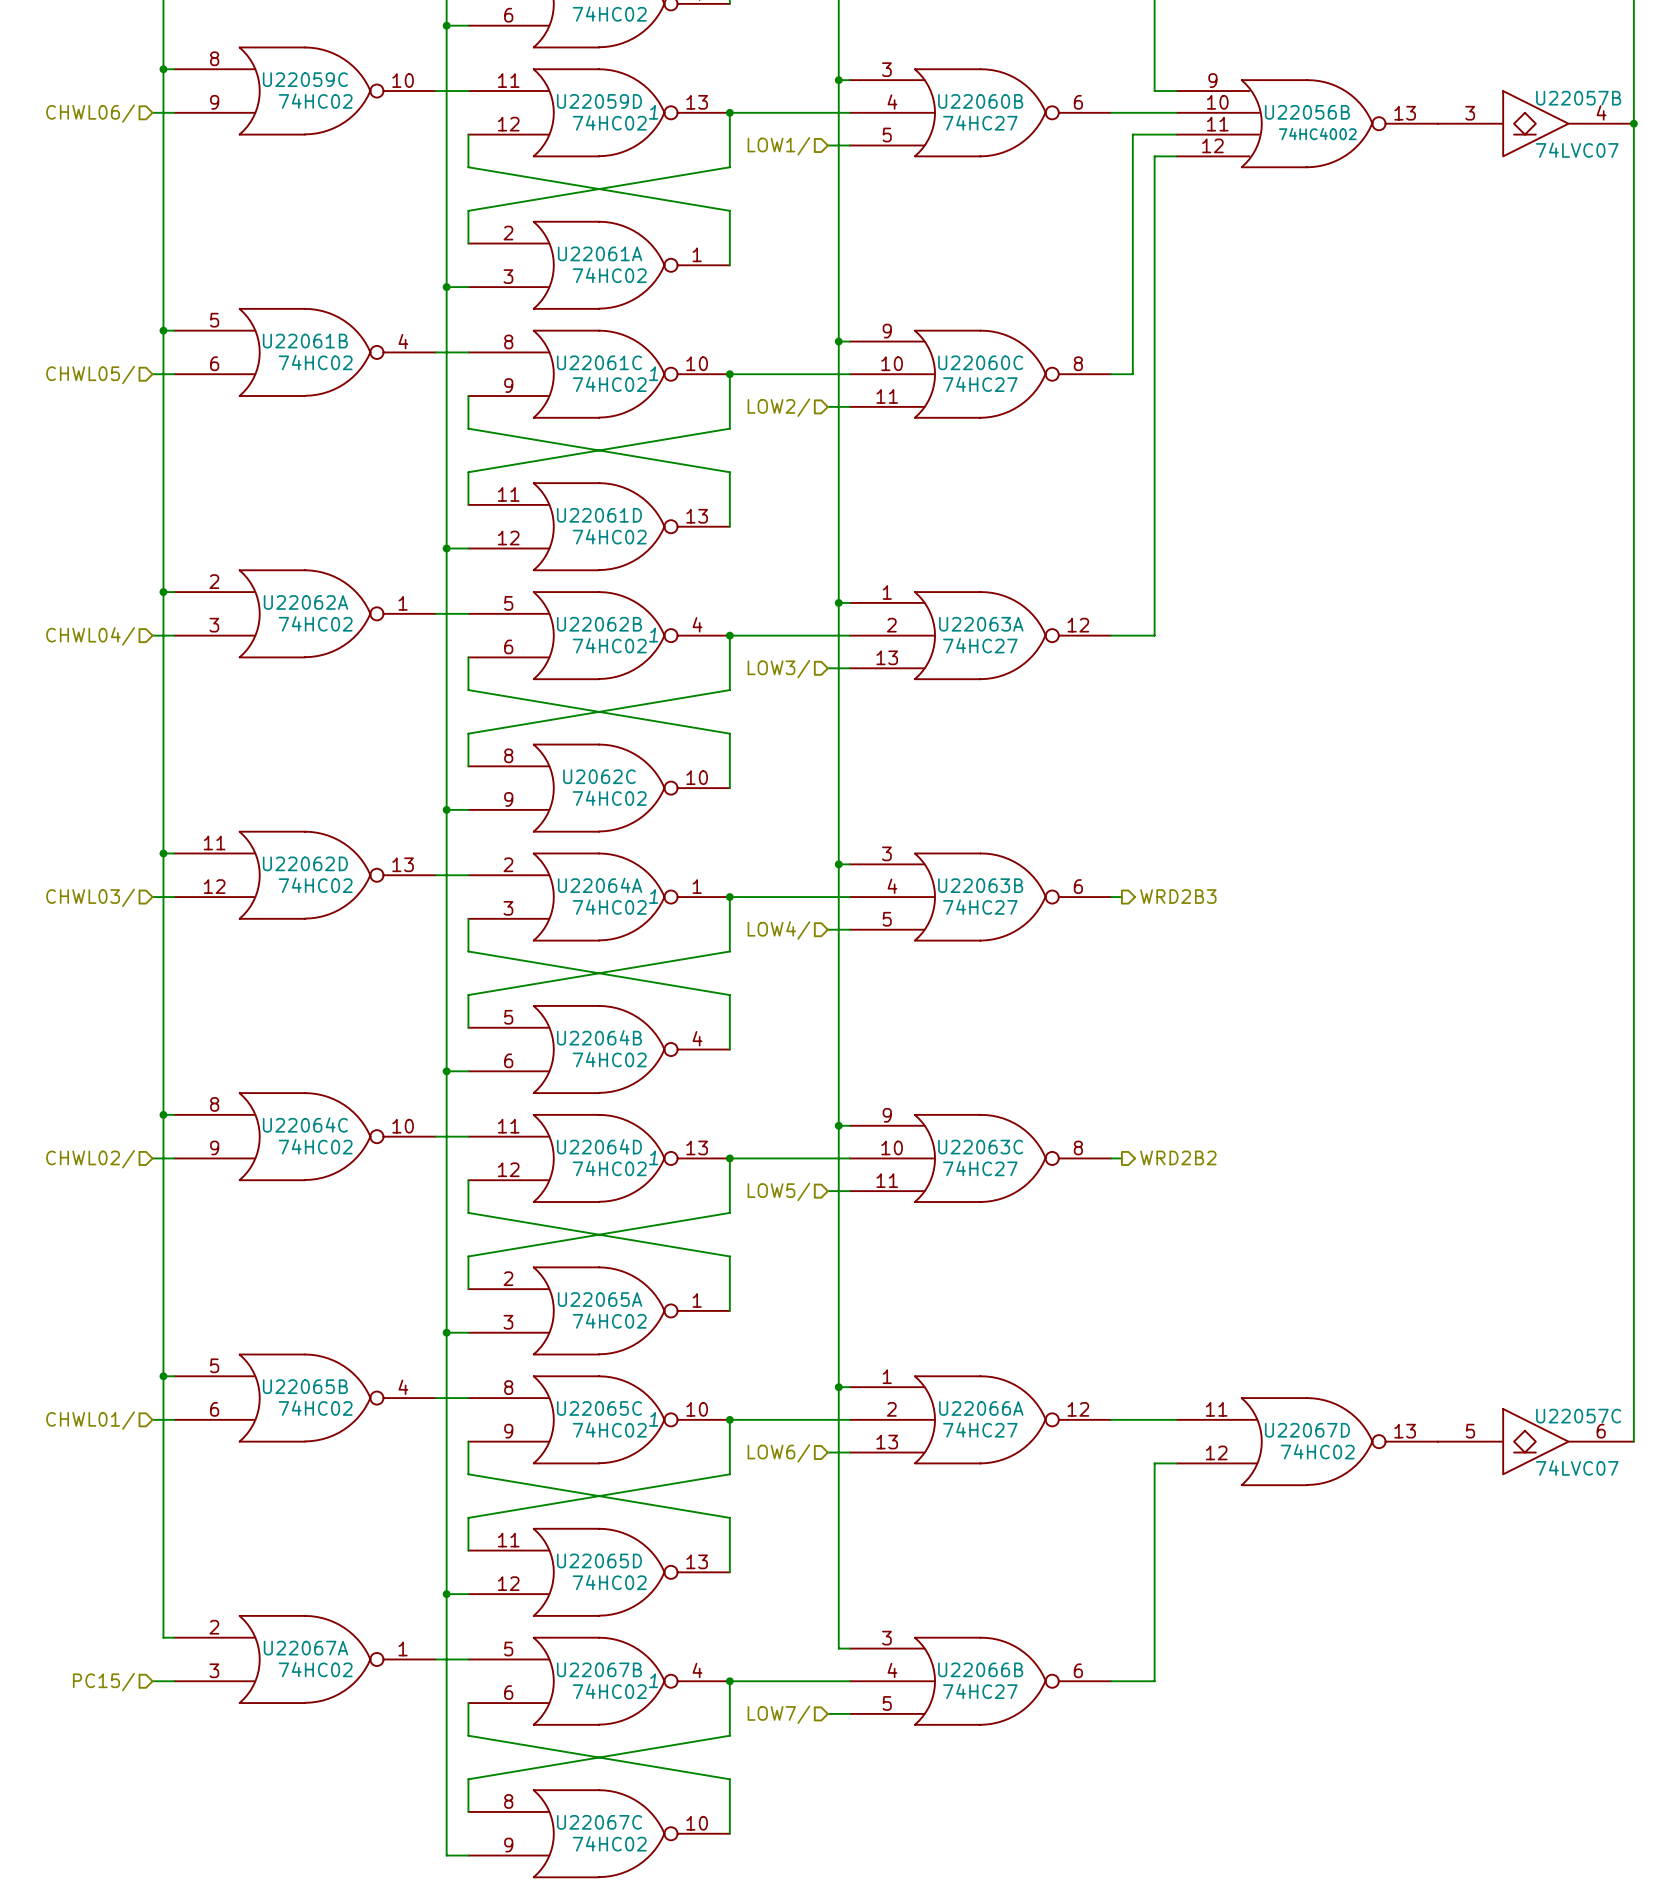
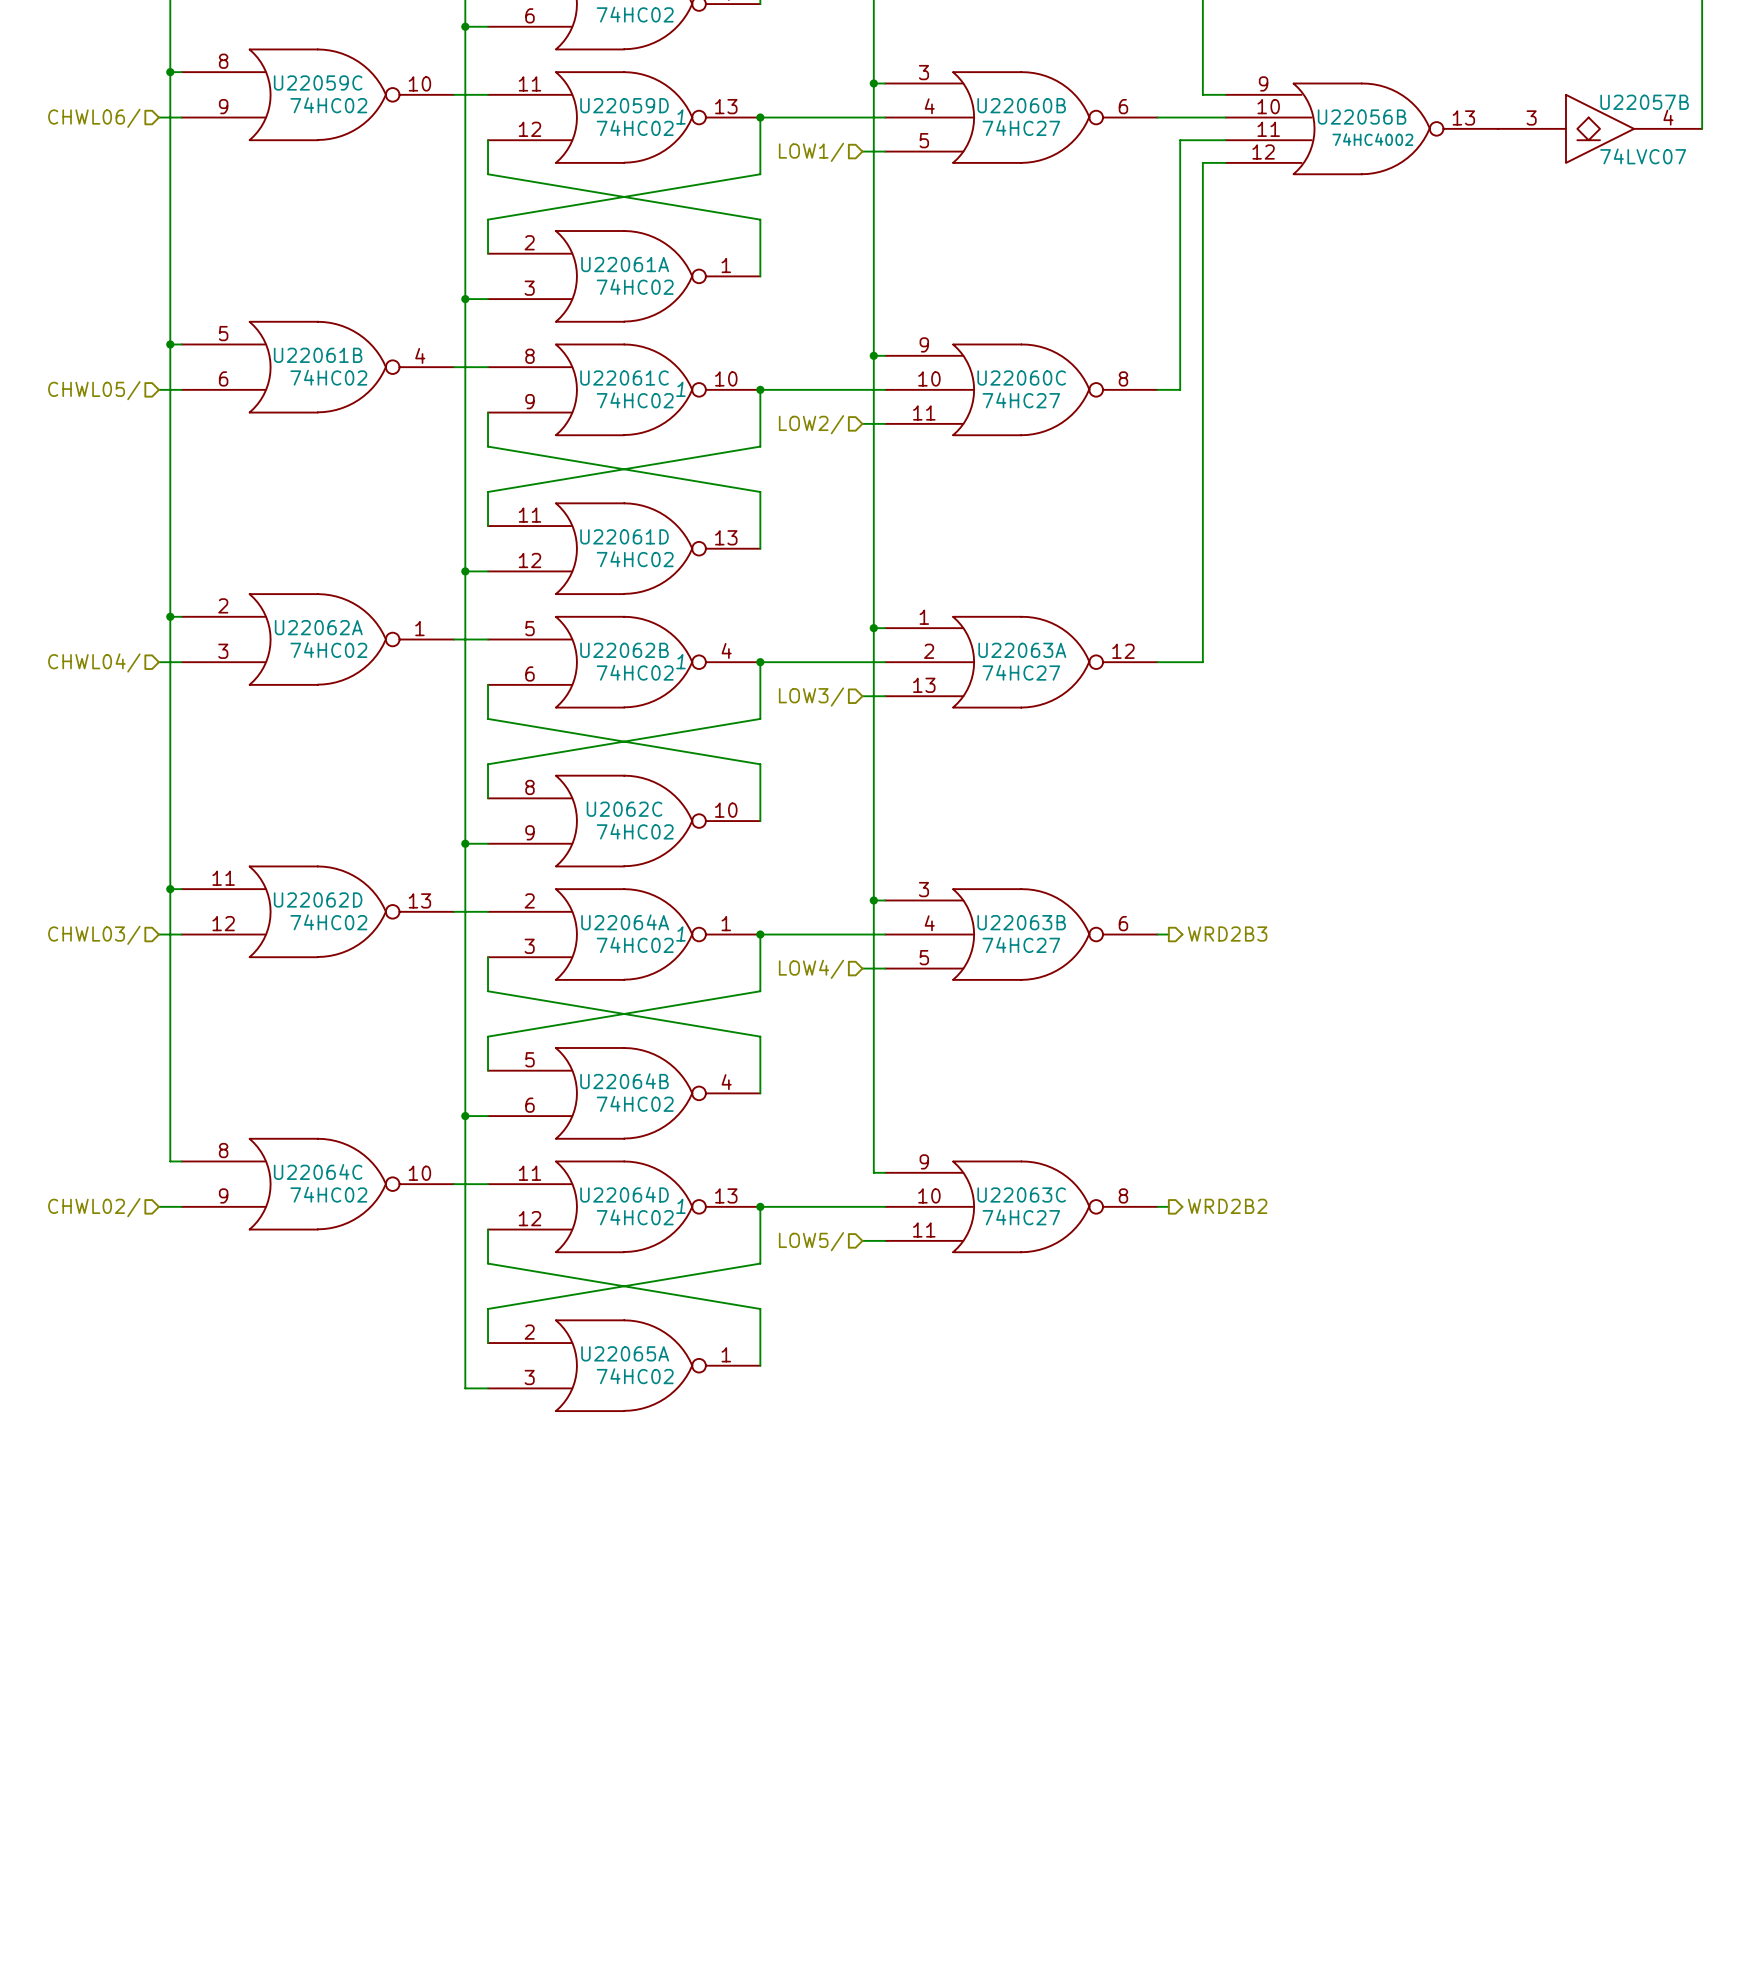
wire: (1633, 123) (1633, 1441) -> none
junction: (1633, 123) -> none
wire: (163, 1114) (163, 1637) (174, 1637) -> none
junction: (163, 1114) -> none
wire: (838, 1125) (838, 1648) (849, 1648) -> none
junction: (838, 1125) -> none
wire: (446, 1332) (446, 1855) (468, 1855) -> none
junction: (446, 1332) -> none
wire: (163, 1376) (174, 1376) -> none
junction: (163, 1376) -> none
wire: (838, 1387) (849, 1387) -> none
junction: (838, 1387) -> none
U22065B: 74HC02 (305, 1398) -> none
wire: (435, 1398) (468, 1398) -> none
wire: (152, 1419) (174, 1419) -> none
U22065C: 74HC02 (599, 1419) -> none
junction: (729, 1419) -> none
wire: (849, 1419) (729, 1419) (729, 1474) (468, 1517) (468, 1550) -> none
U22066A: 74HC27 (980, 1419) -> none
wire: (1111, 1419) (1176, 1419) -> none
hierarchical label: CHWL01/ (90, 1420) -> none
wire: (468, 1441) (468, 1474) (729, 1517) (729, 1572) -> none
U22067D: 74HC02 (1307, 1441) -> none
U22057C: 74LVC07 (1535, 1441) -> none
wire: (827, 1452) (849, 1452) -> none
hierarchical label: LOW6/ (778, 1453) -> none
wire: (1176, 1463) (1154, 1463) (1154, 1681) (1111, 1681) -> none
U22065D: 74HC02 (599, 1572) -> none
wire: (446, 1594) (468, 1594) -> none
junction: (446, 1594) -> none
U22067A: 74HC02 (305, 1659) -> none
wire: (435, 1659) (468, 1659) -> none
wire: (152, 1681) (174, 1681) -> none
U22067B: 74HC02 (599, 1681) -> none
junction: (729, 1681) -> none
wire: (849, 1681) (729, 1681) (729, 1735) (468, 1779) (468, 1811) -> none
U22066B: 74HC27 (980, 1681) -> none
hierarchical label: PC15/ (103, 1682) -> none
wire: (468, 1703) (468, 1735) (729, 1779) (729, 1833) -> none
wire: (827, 1713) (849, 1713) -> none
hierarchical label: LOW7/ (778, 1714) -> none
U22067C: 74HC02 (599, 1833) -> none

